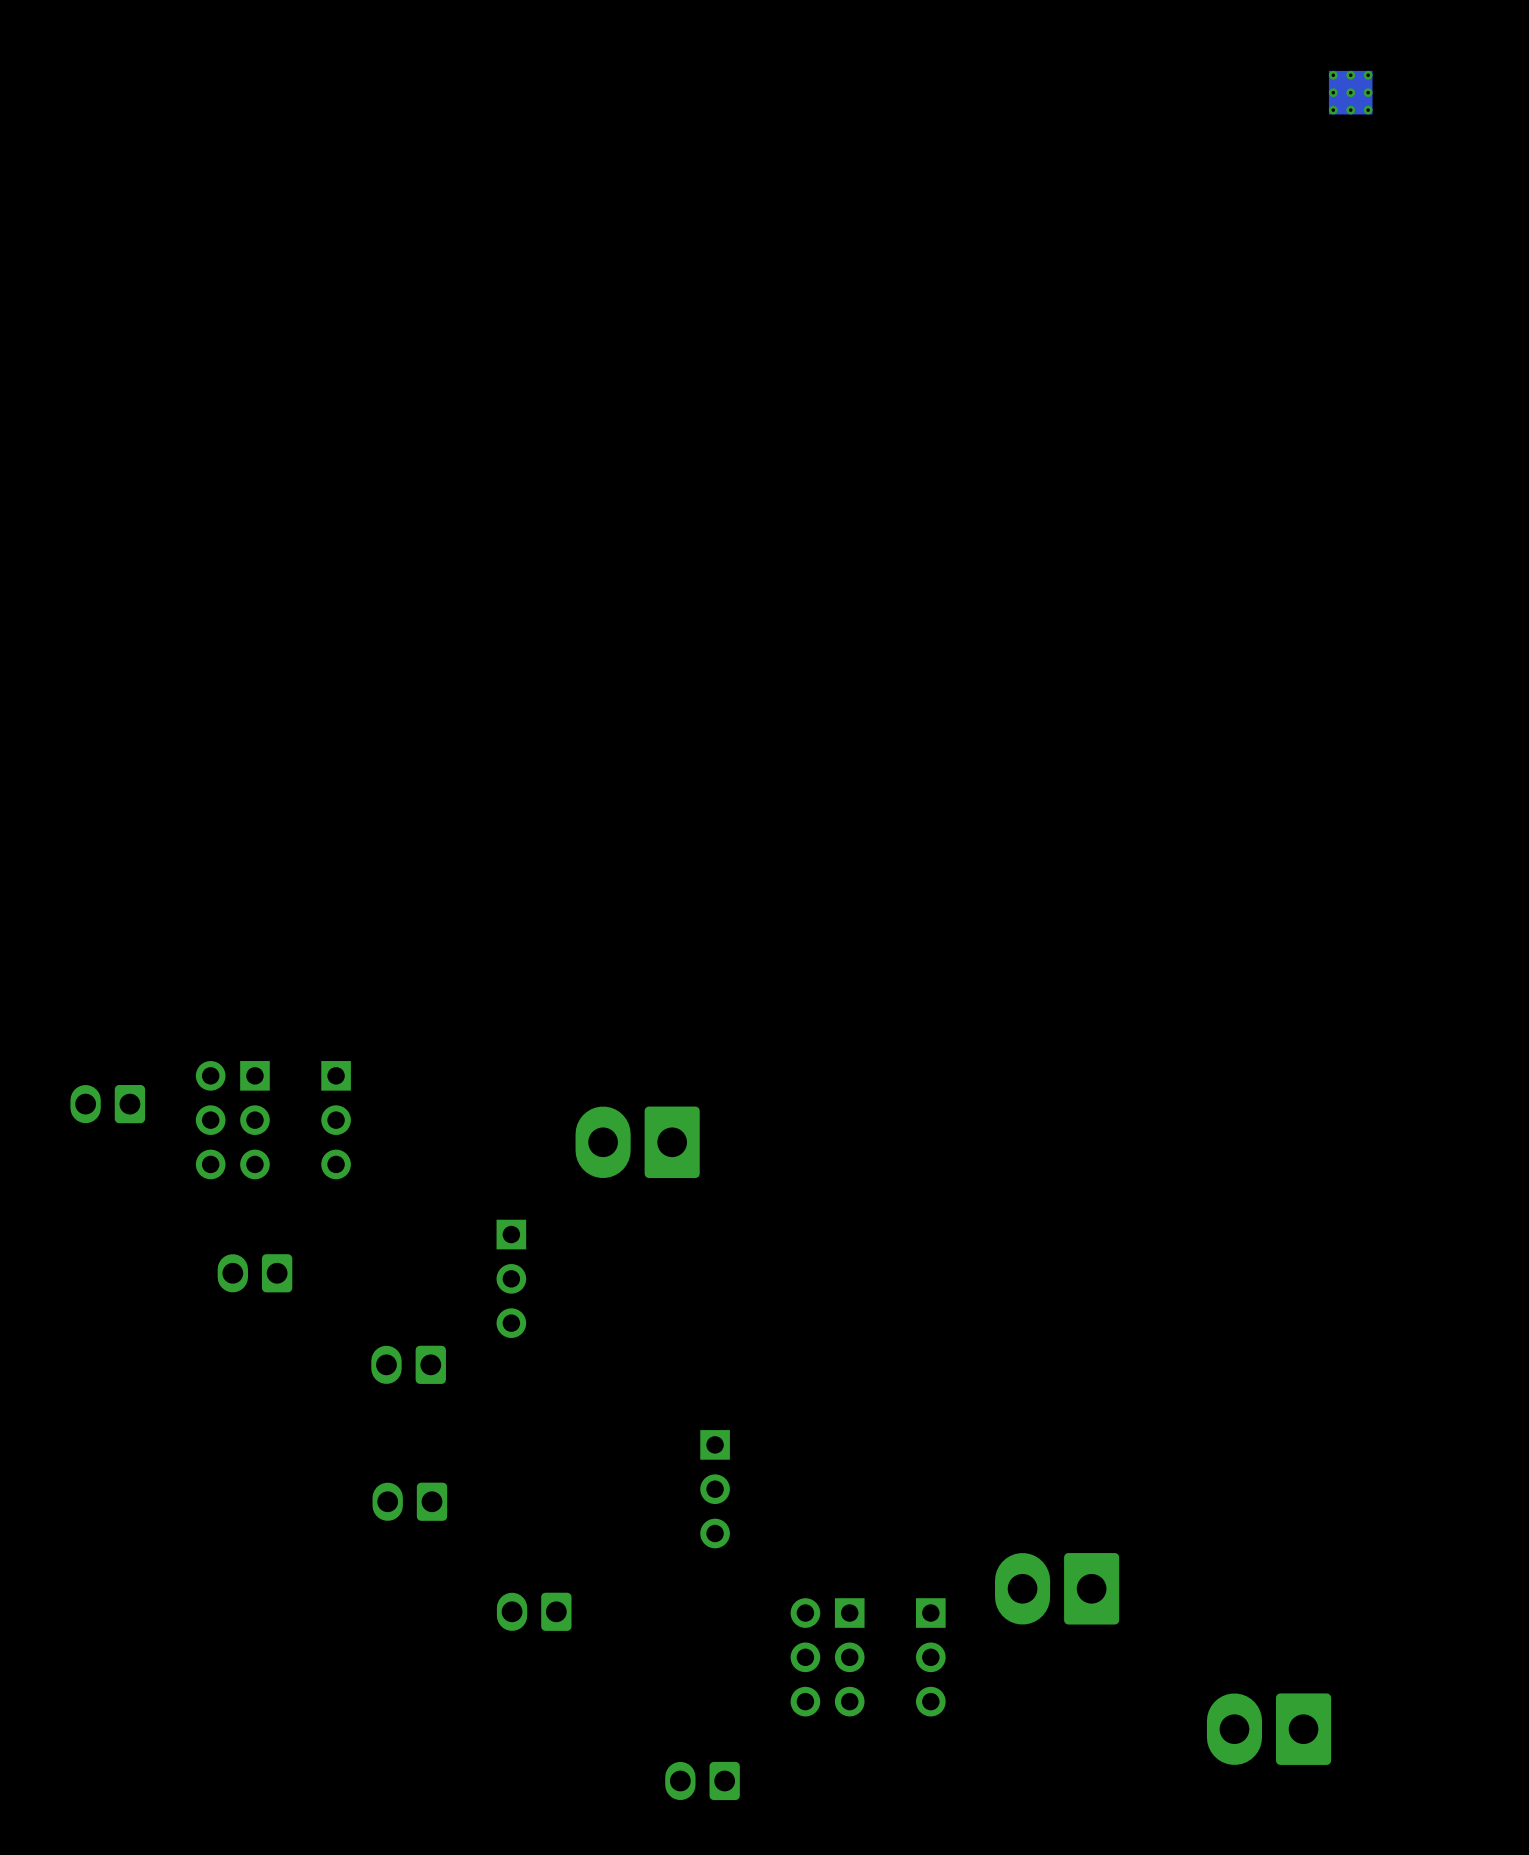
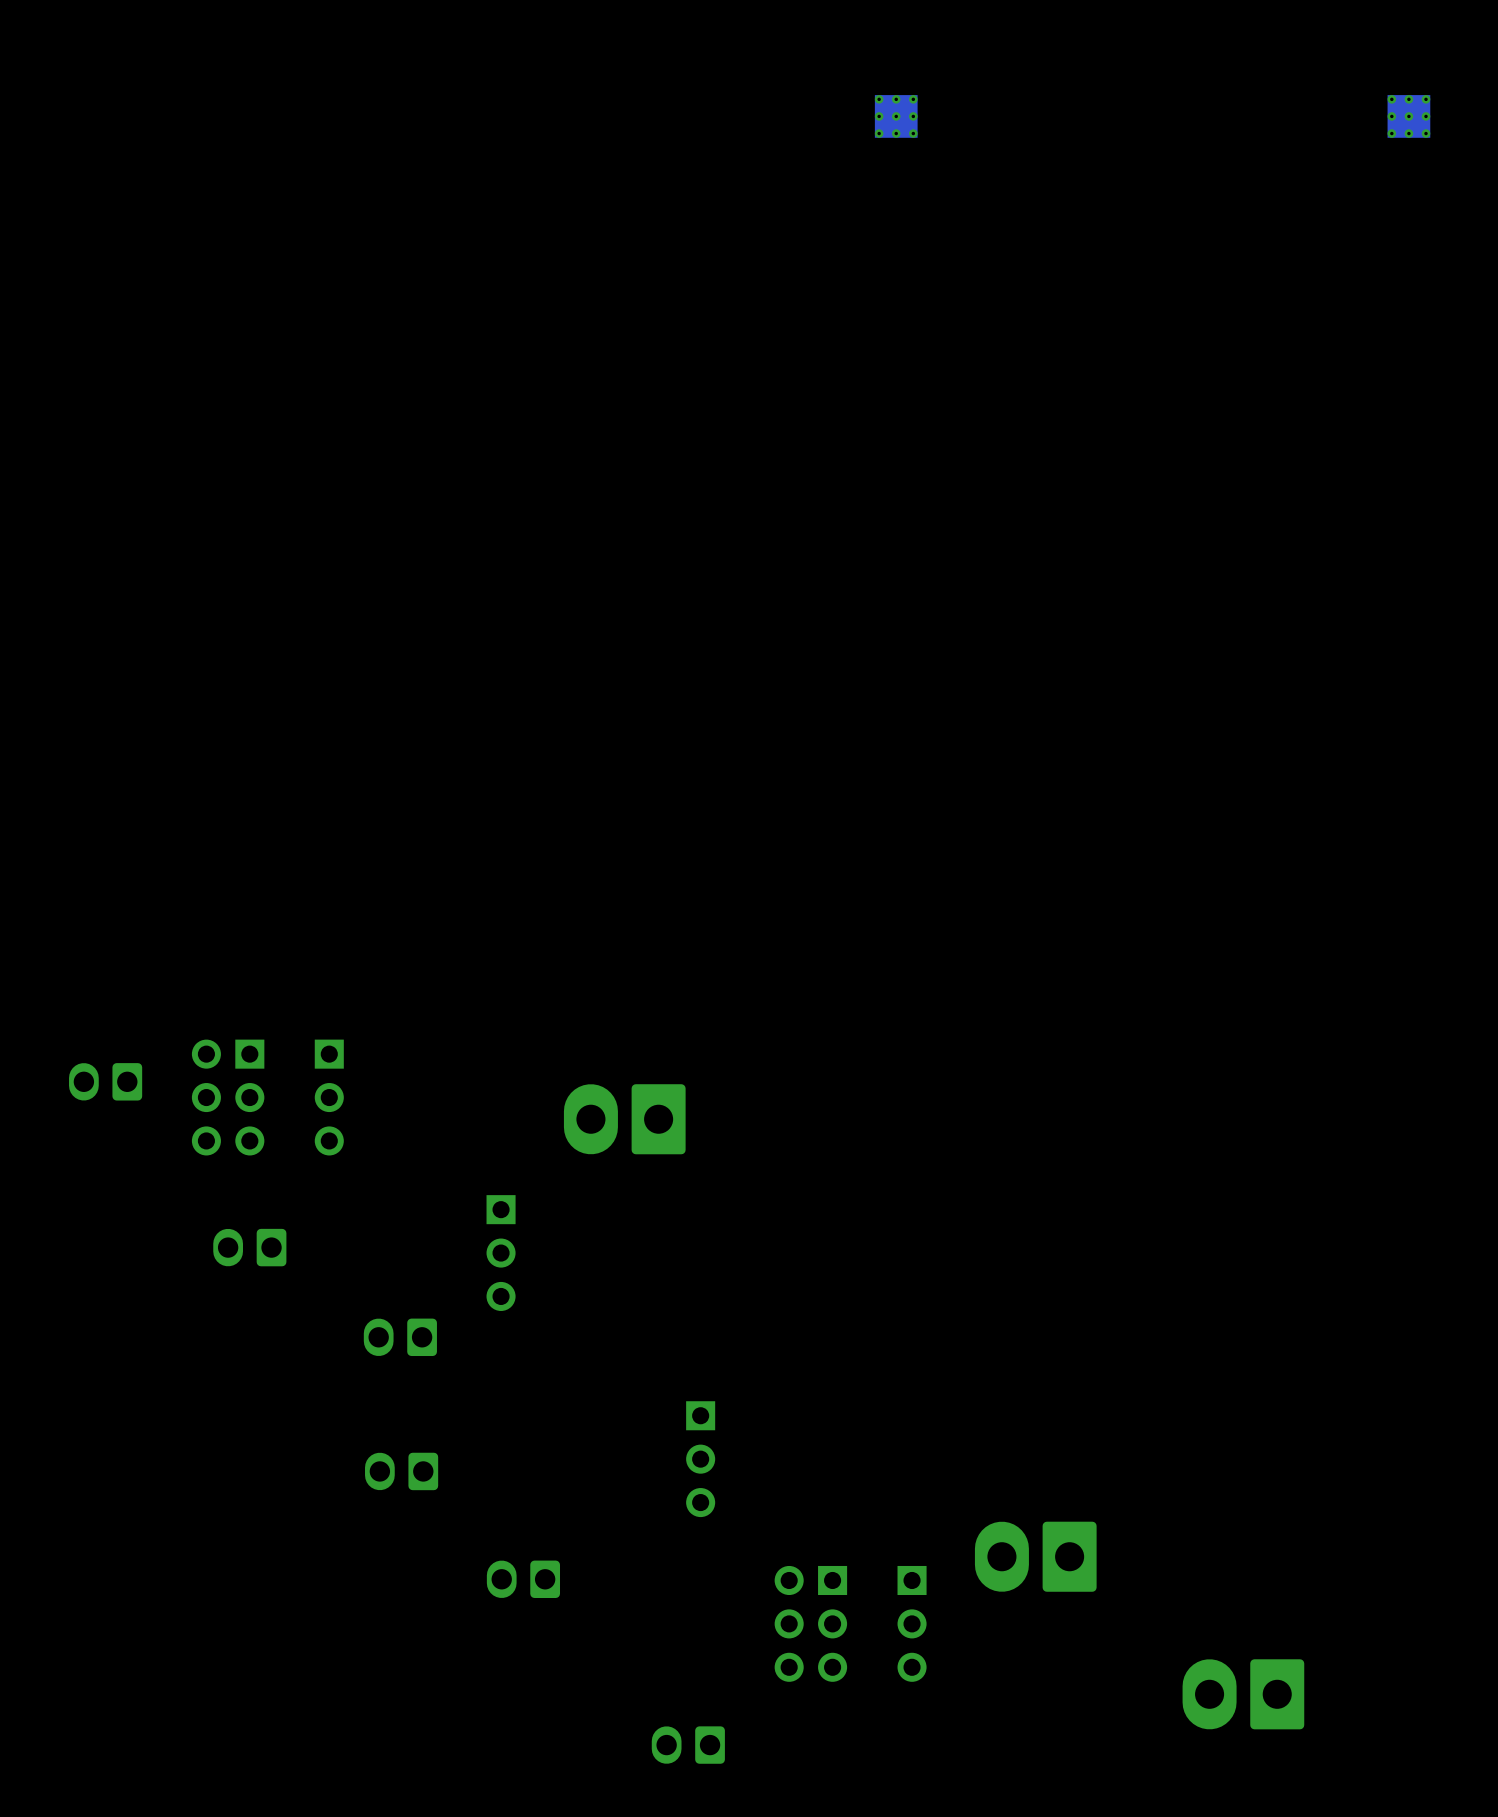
part position: (1350, 92) -> (1408, 116)
part: none -> (896, 116)

